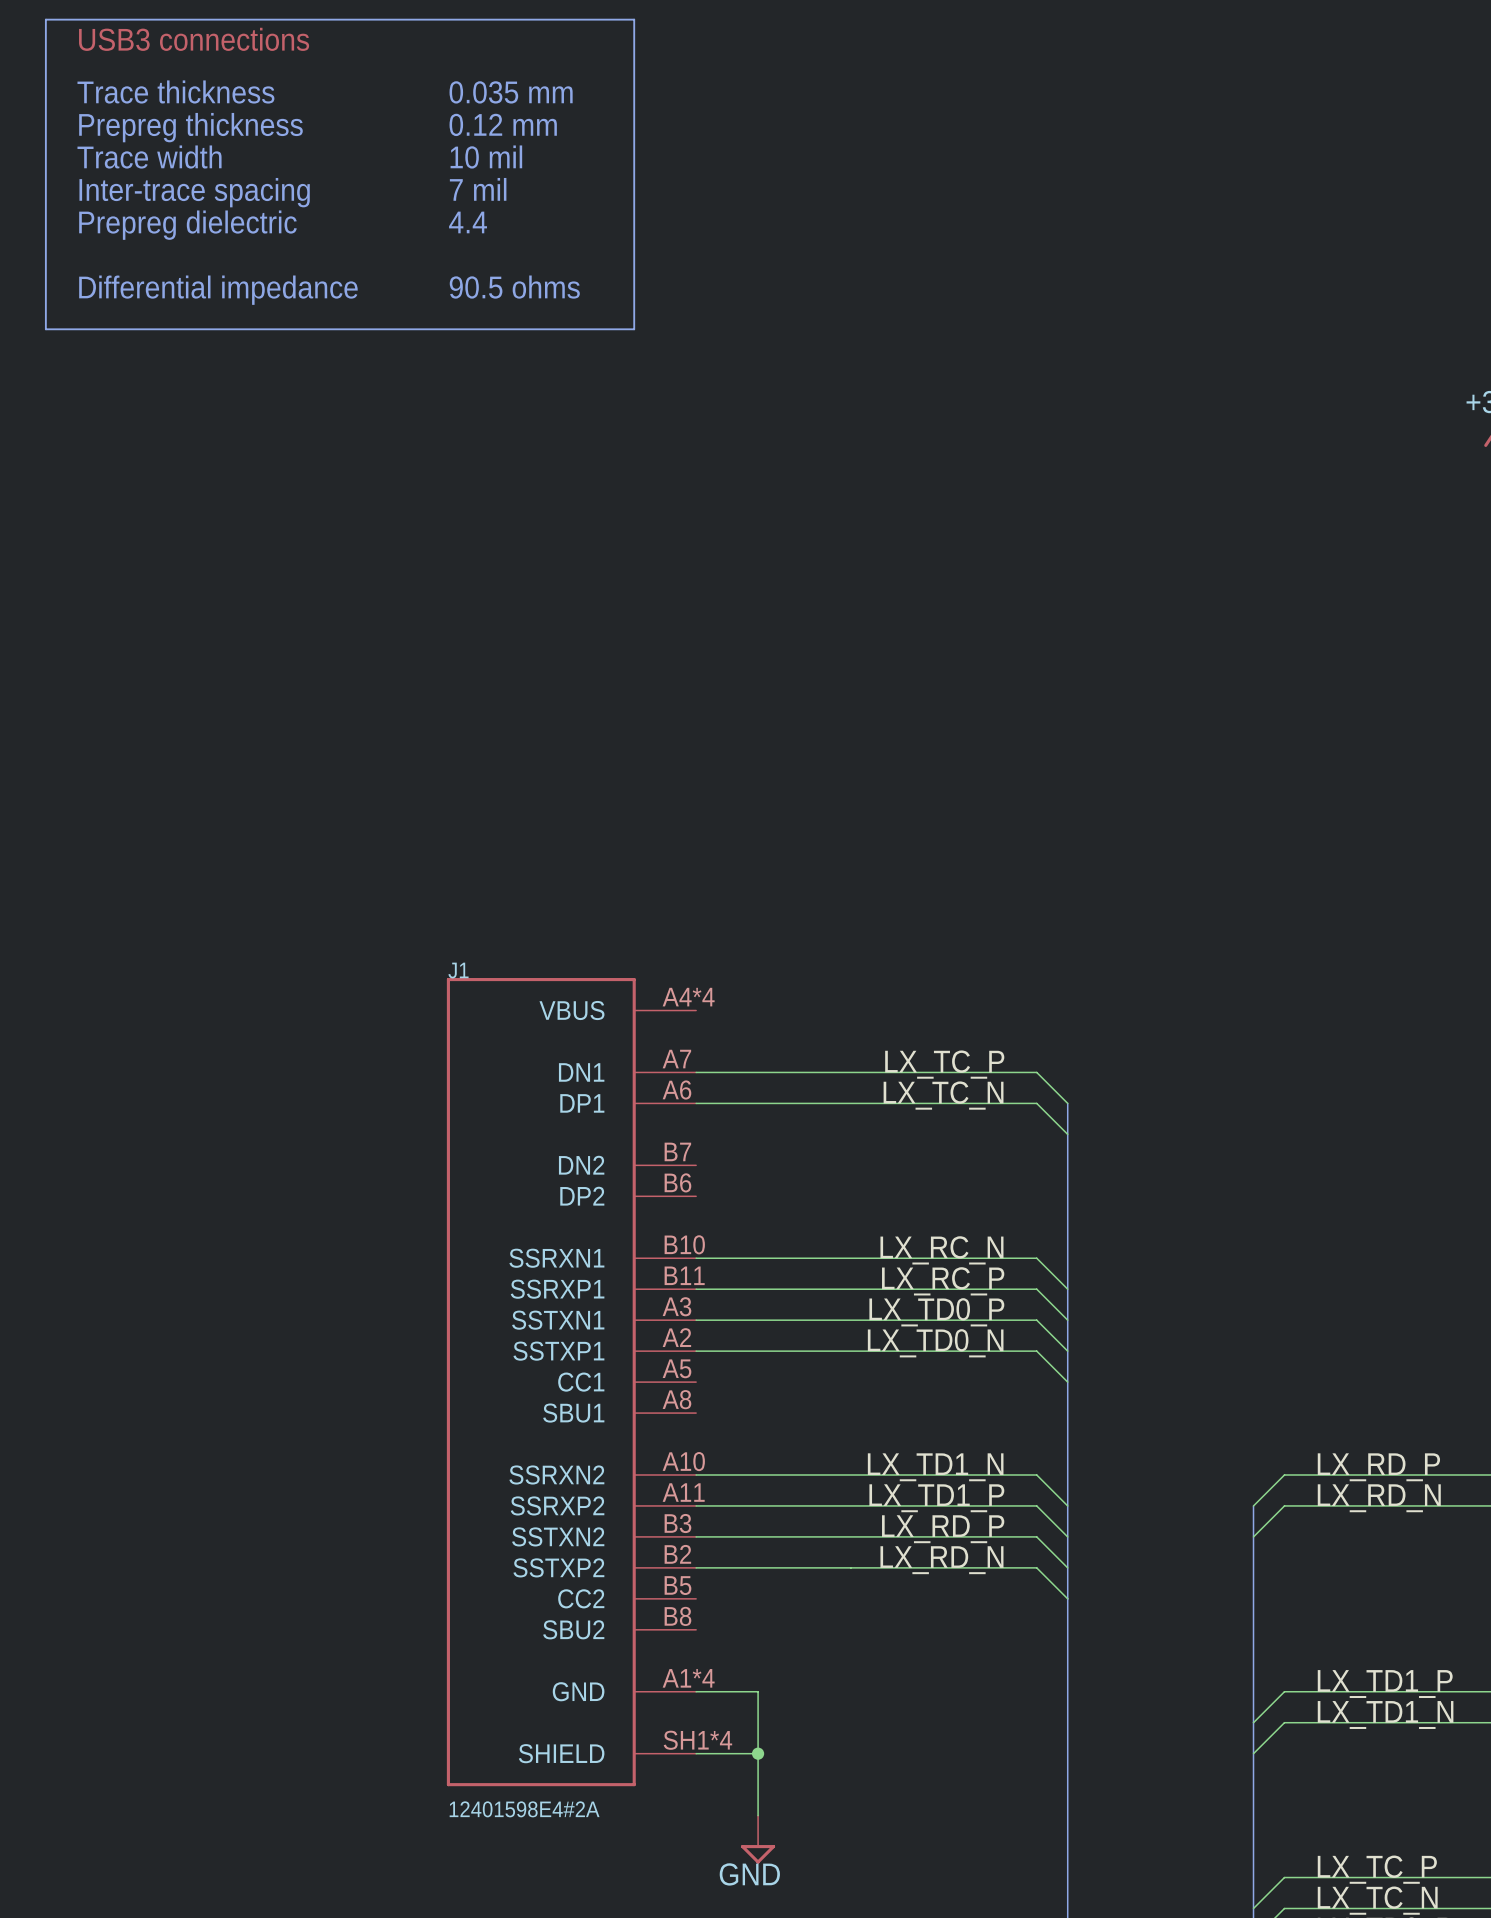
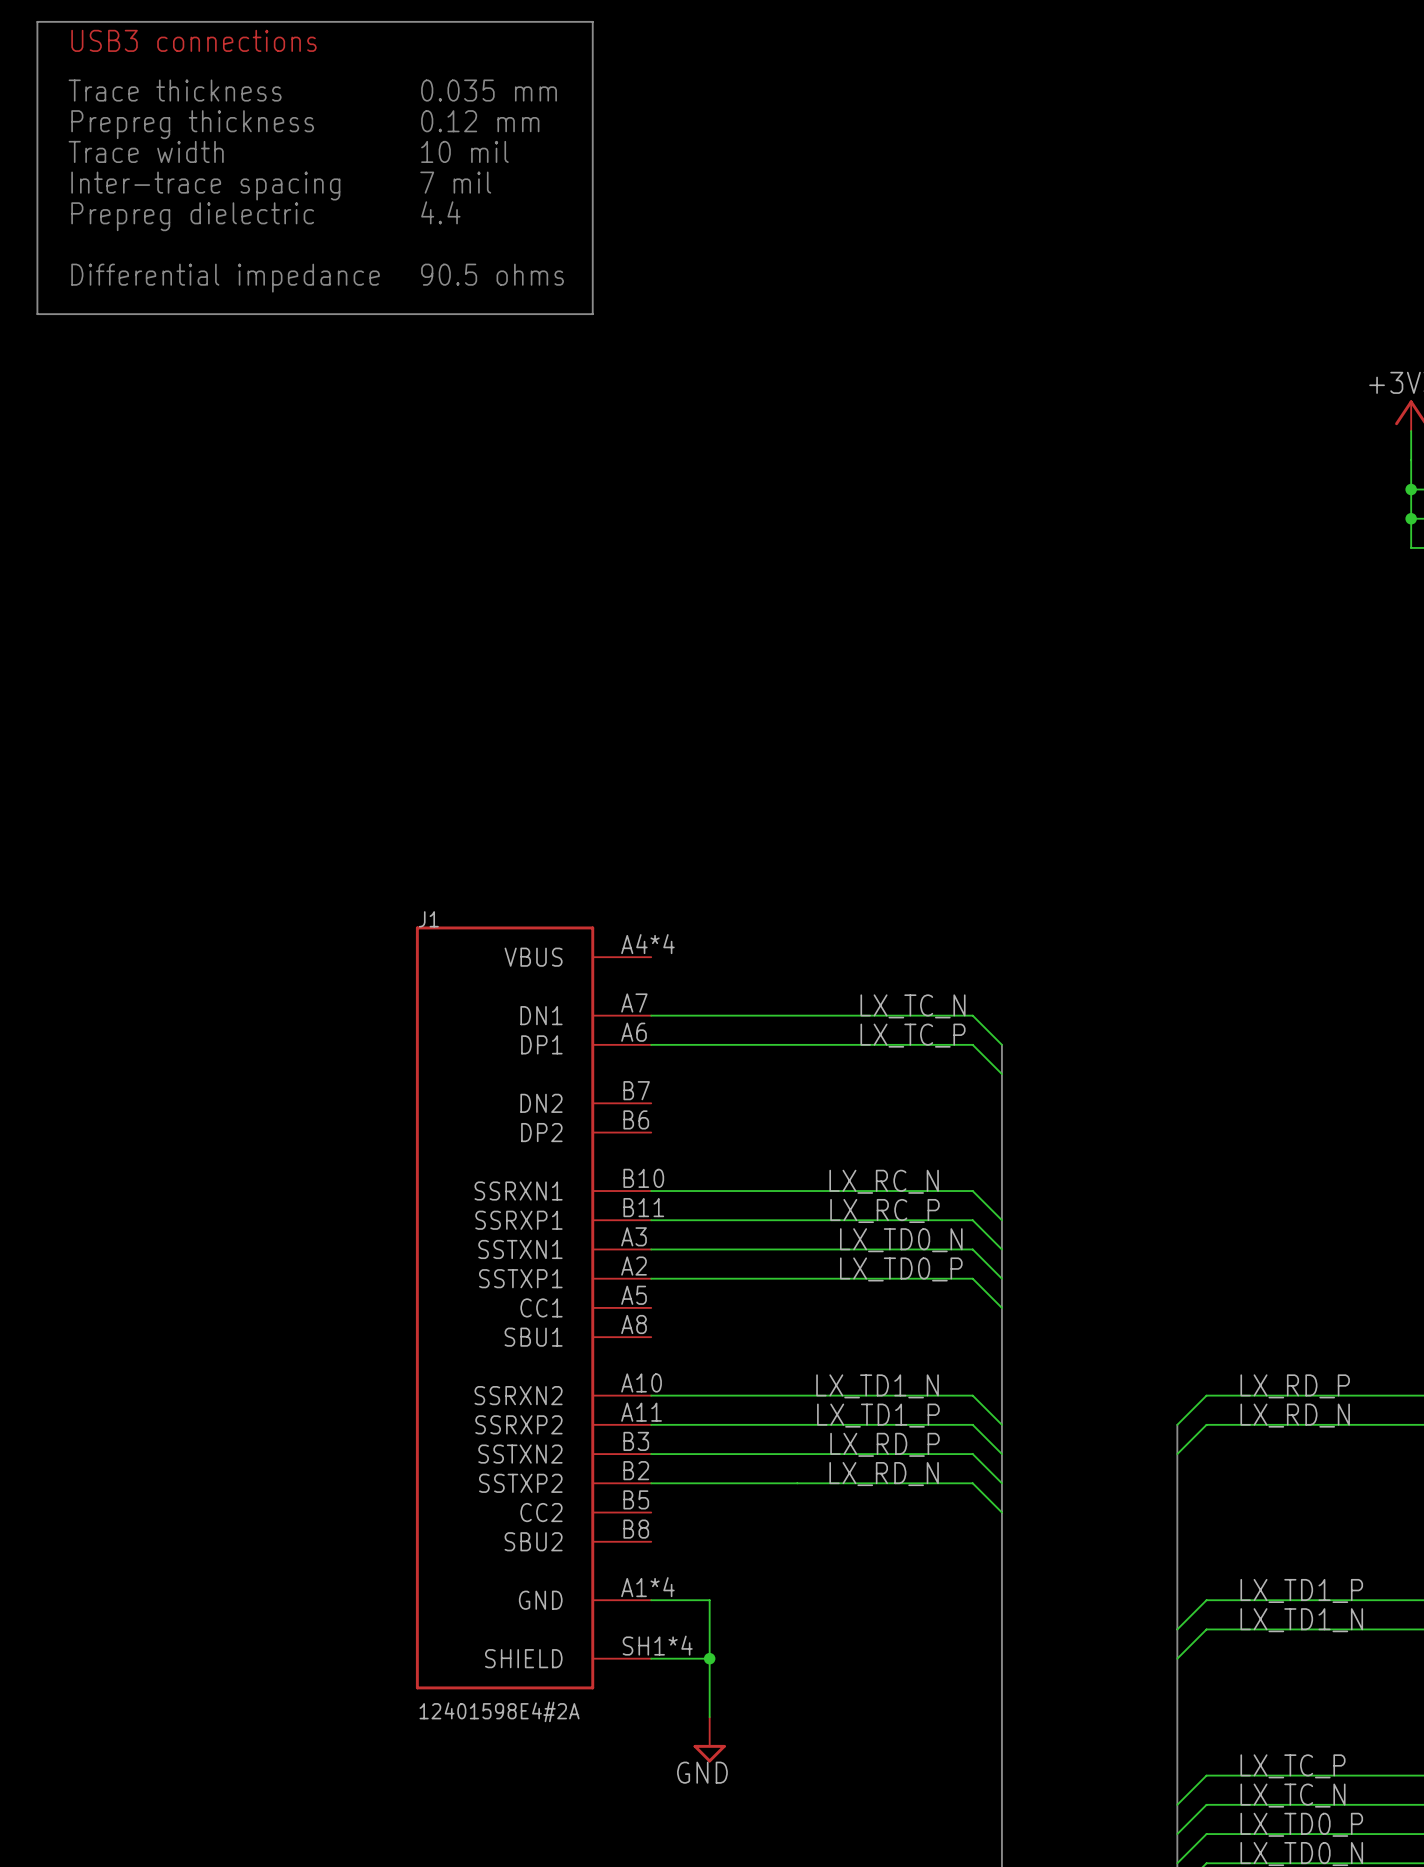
label position: LX_TC_P (944, 1064) -> LX_TC_P (913, 1035)
label position: LX_TC_N (943, 1095) -> LX_TC_N (913, 1006)
label position: LX_TD0_P (936, 1312) -> LX_TD0_P (901, 1269)
label position: LX_TD0_N (935, 1343) -> LX_TD0_N (901, 1240)

